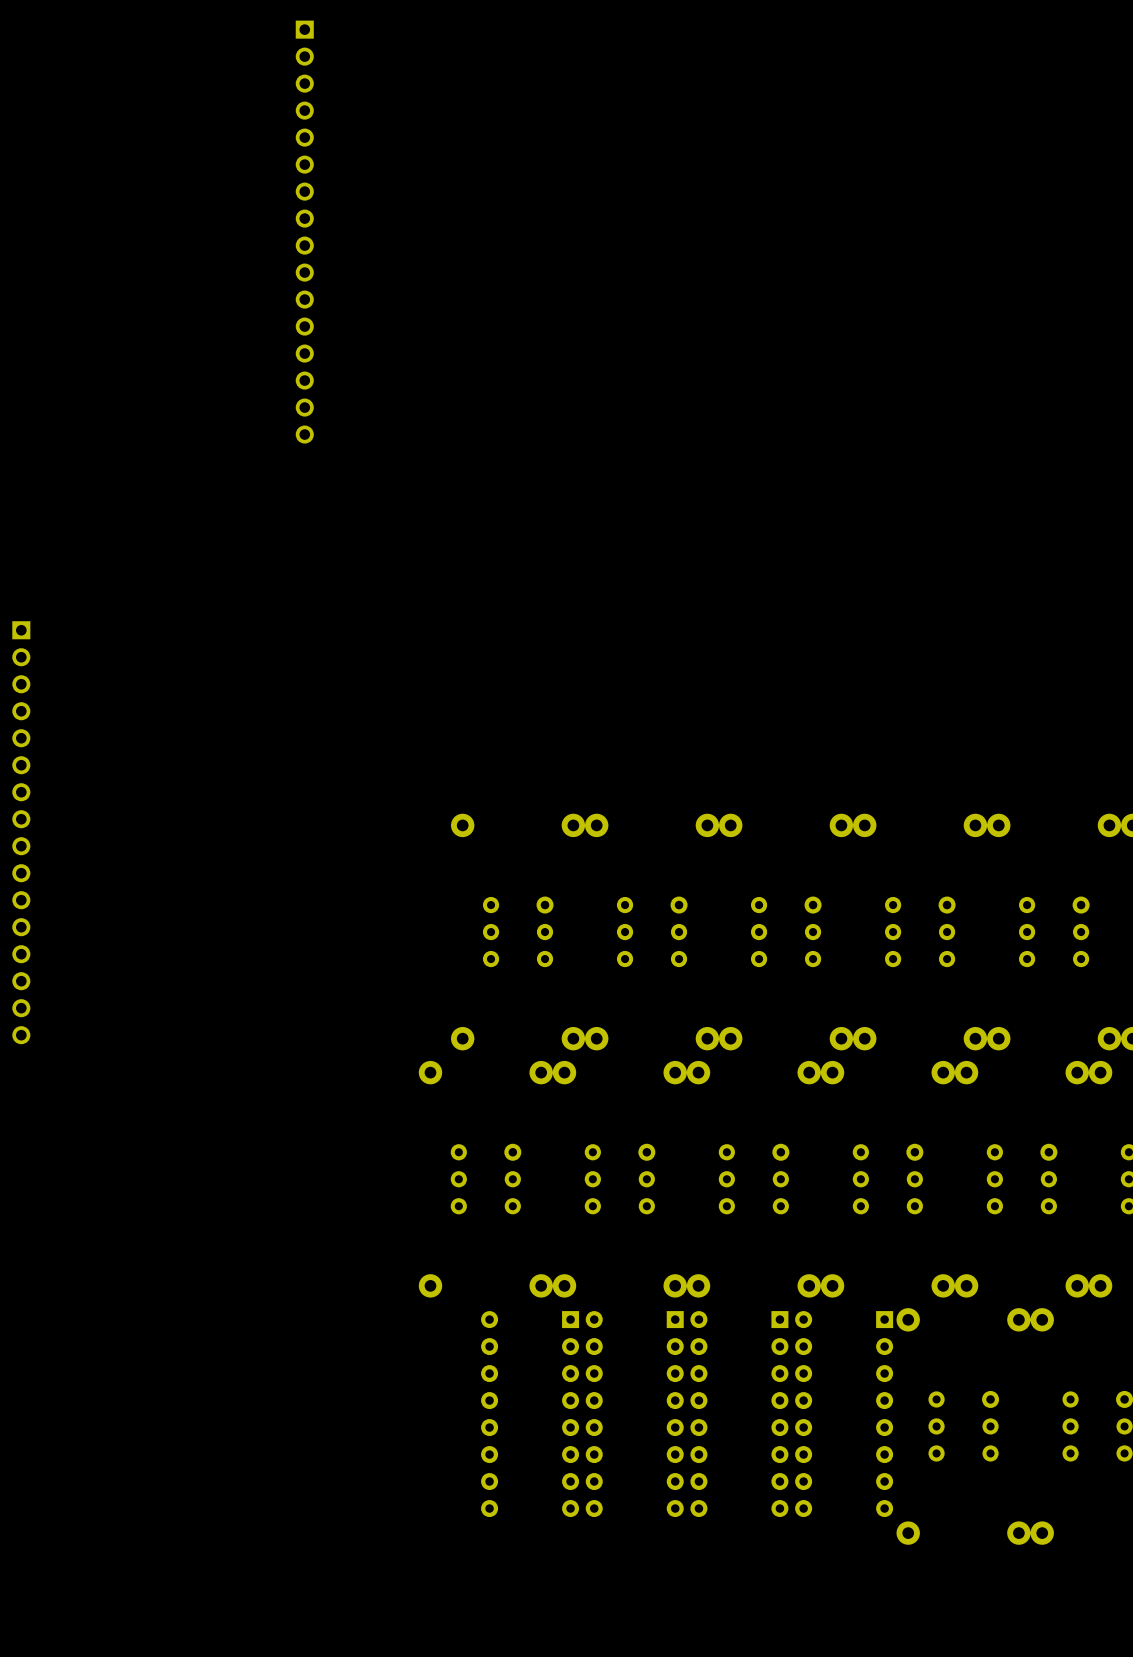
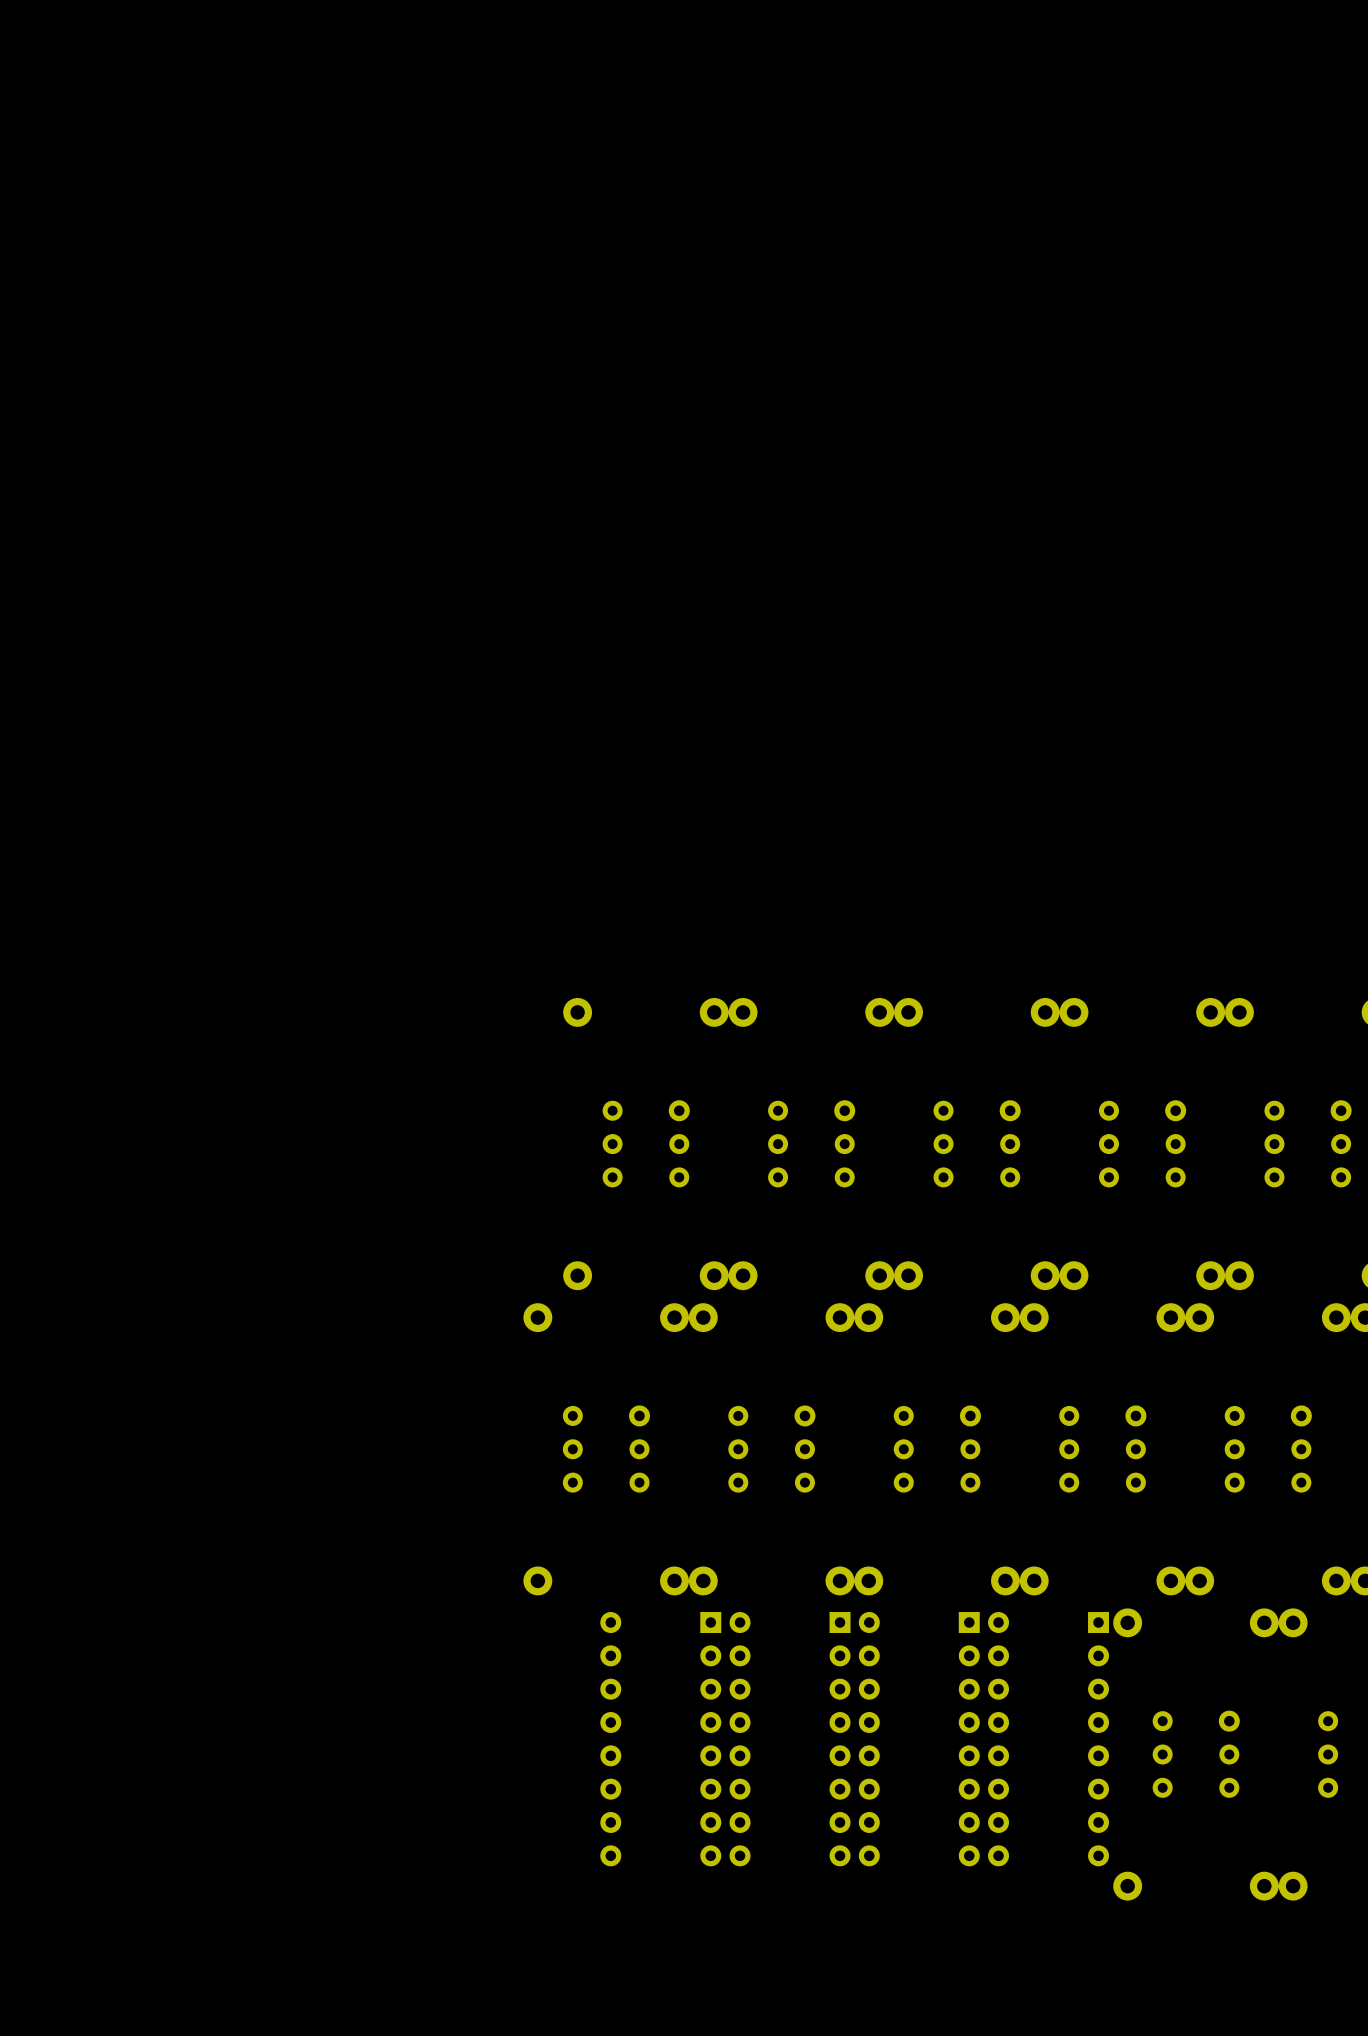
part: (304, 232) -> none
part: (21, 832) -> none

